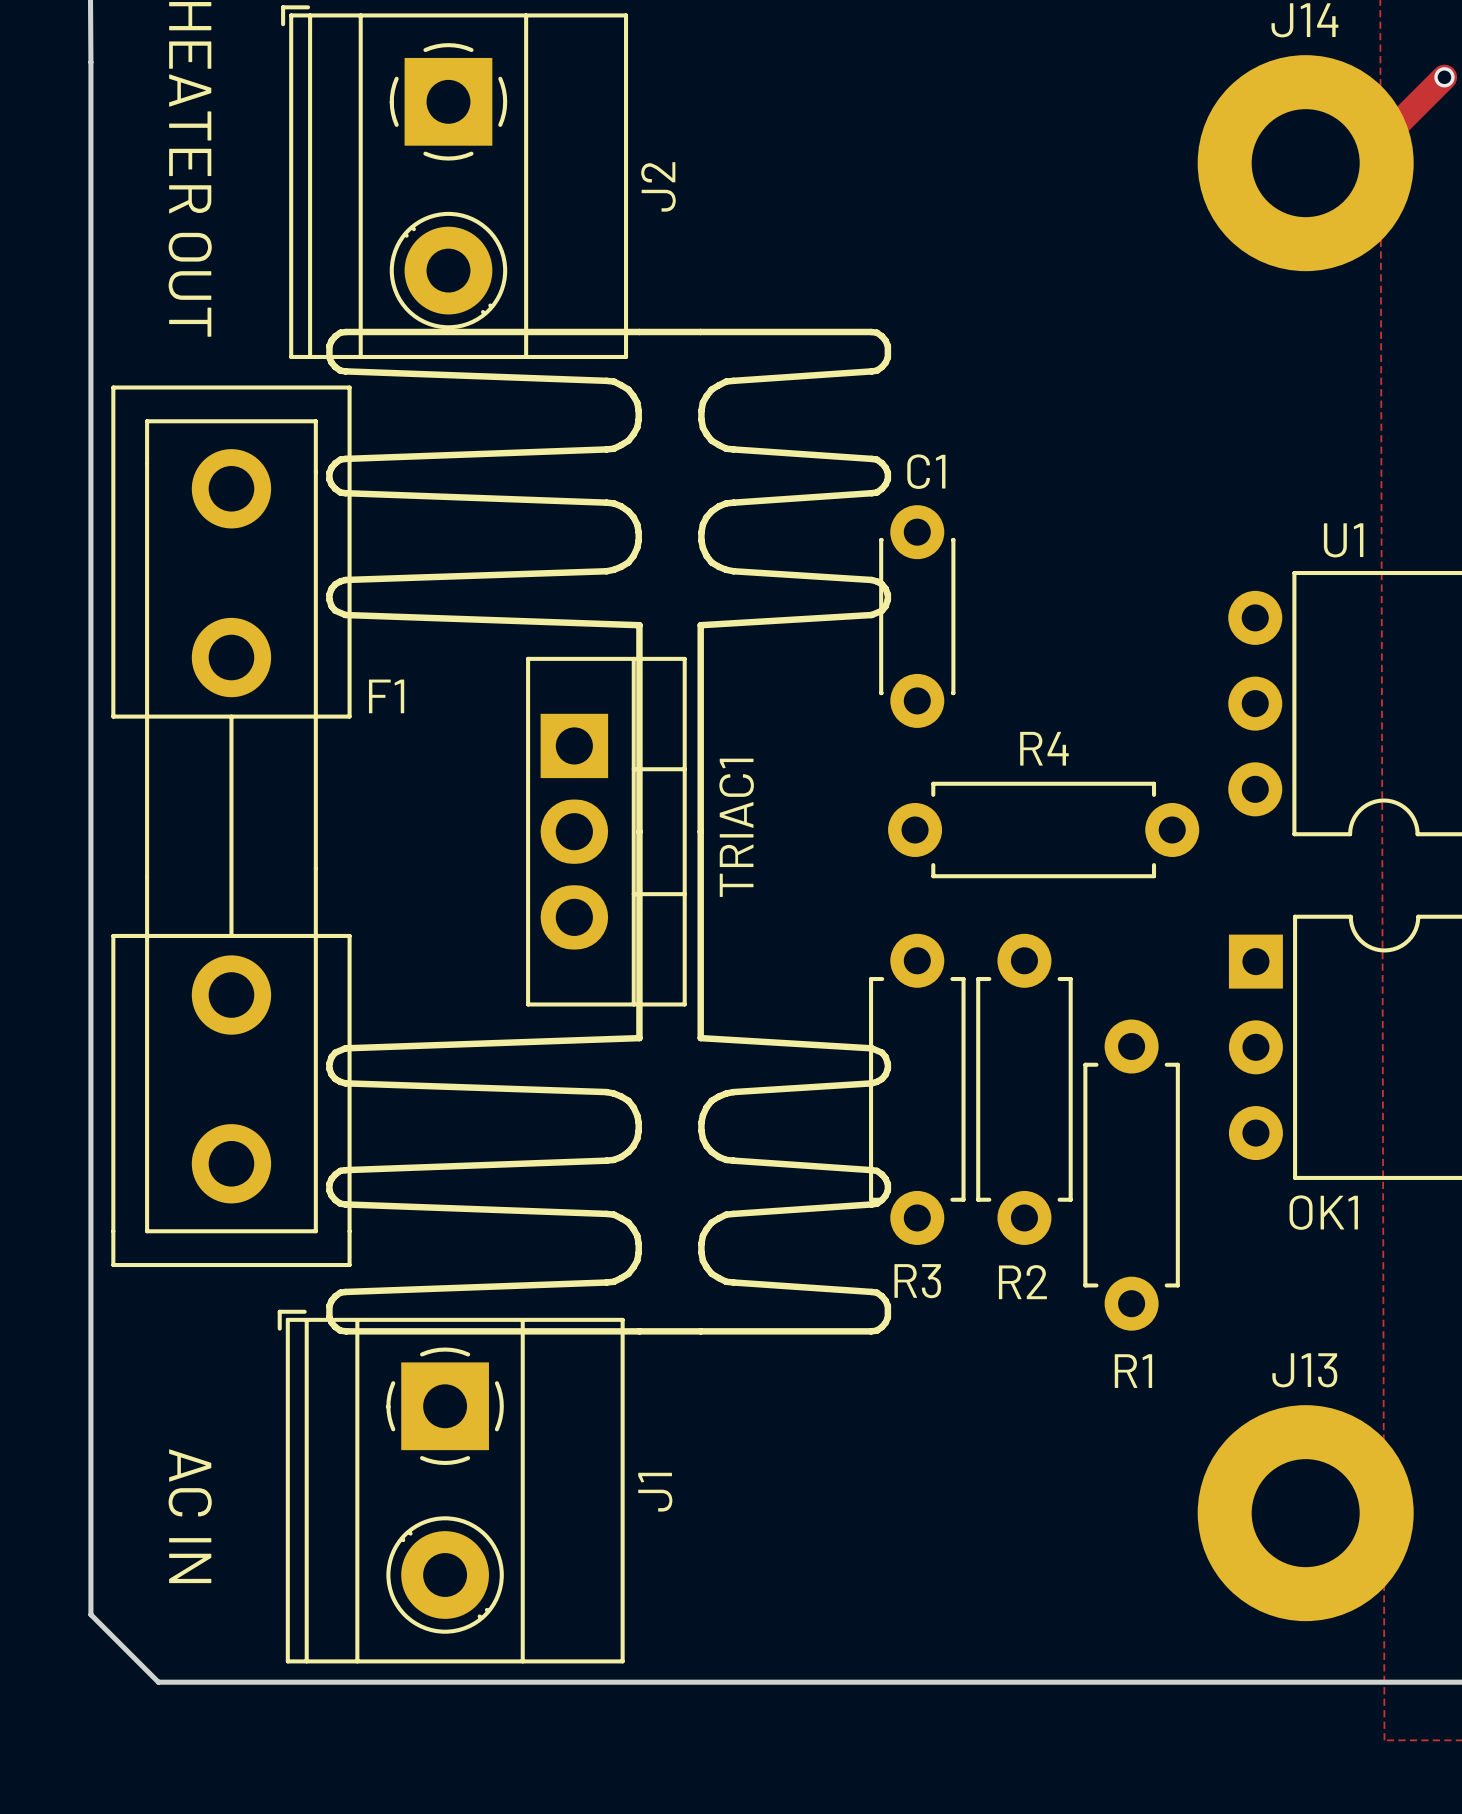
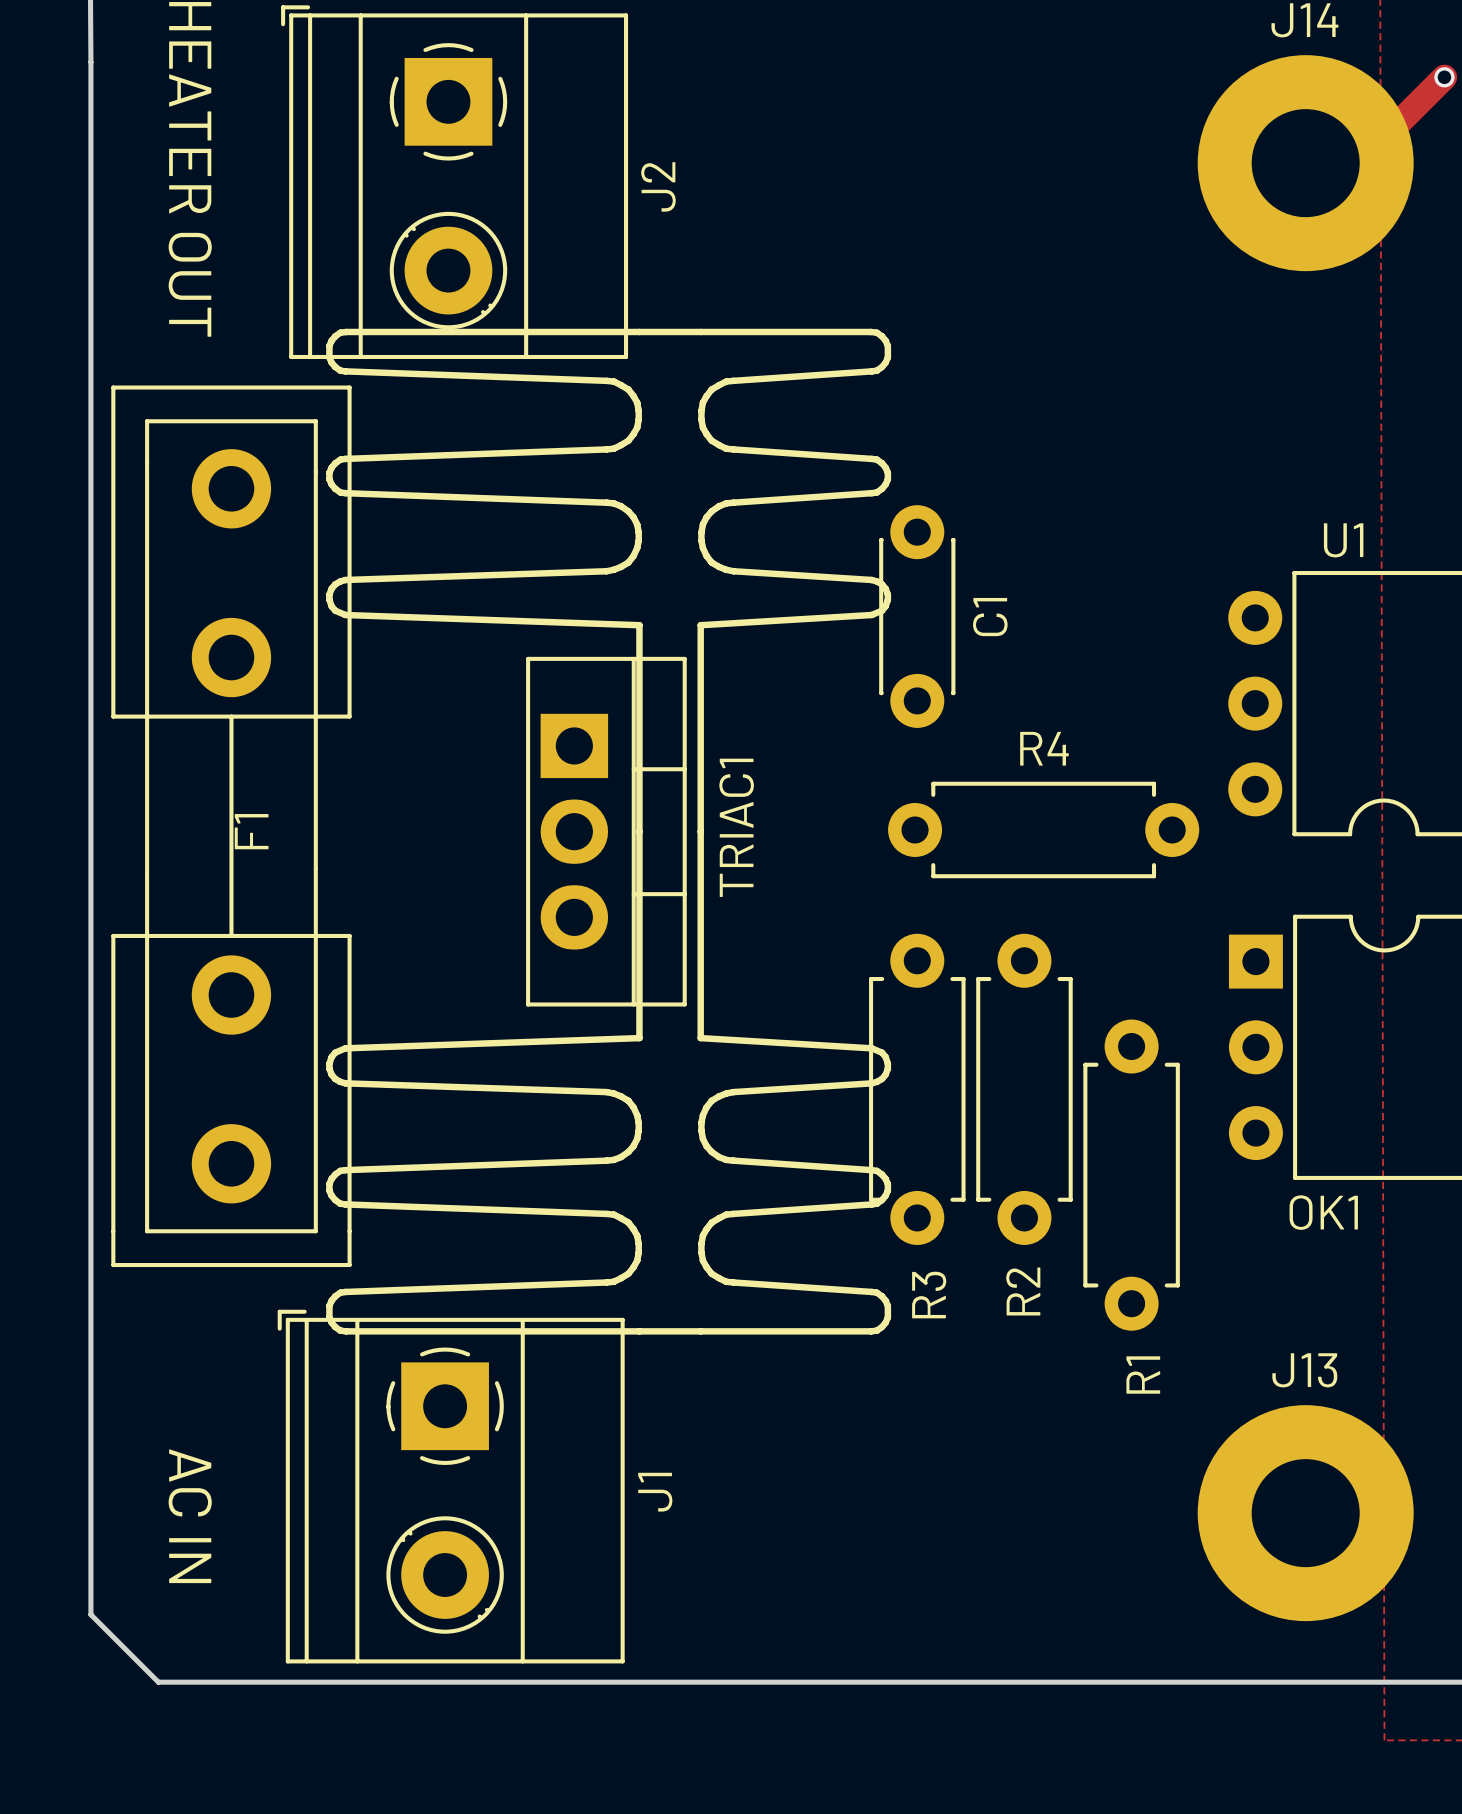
C1 name rotation: 0° (926, 471) -> 90° counterclockwise (990, 617)
C1 name position: C1 (926, 471) -> C1 (990, 617)
F1 name rotation: 0° (386, 696) -> 90° counterclockwise (251, 831)
F1 name position: F1 (386, 696) -> F1 (251, 831)
R3 name rotation: 0° (917, 1281) -> 90° counterclockwise (929, 1295)
R2 name rotation: 0° (1022, 1282) -> 90° counterclockwise (1023, 1291)
R1 name rotation: 0° (1133, 1371) -> 90° counterclockwise (1143, 1375)

